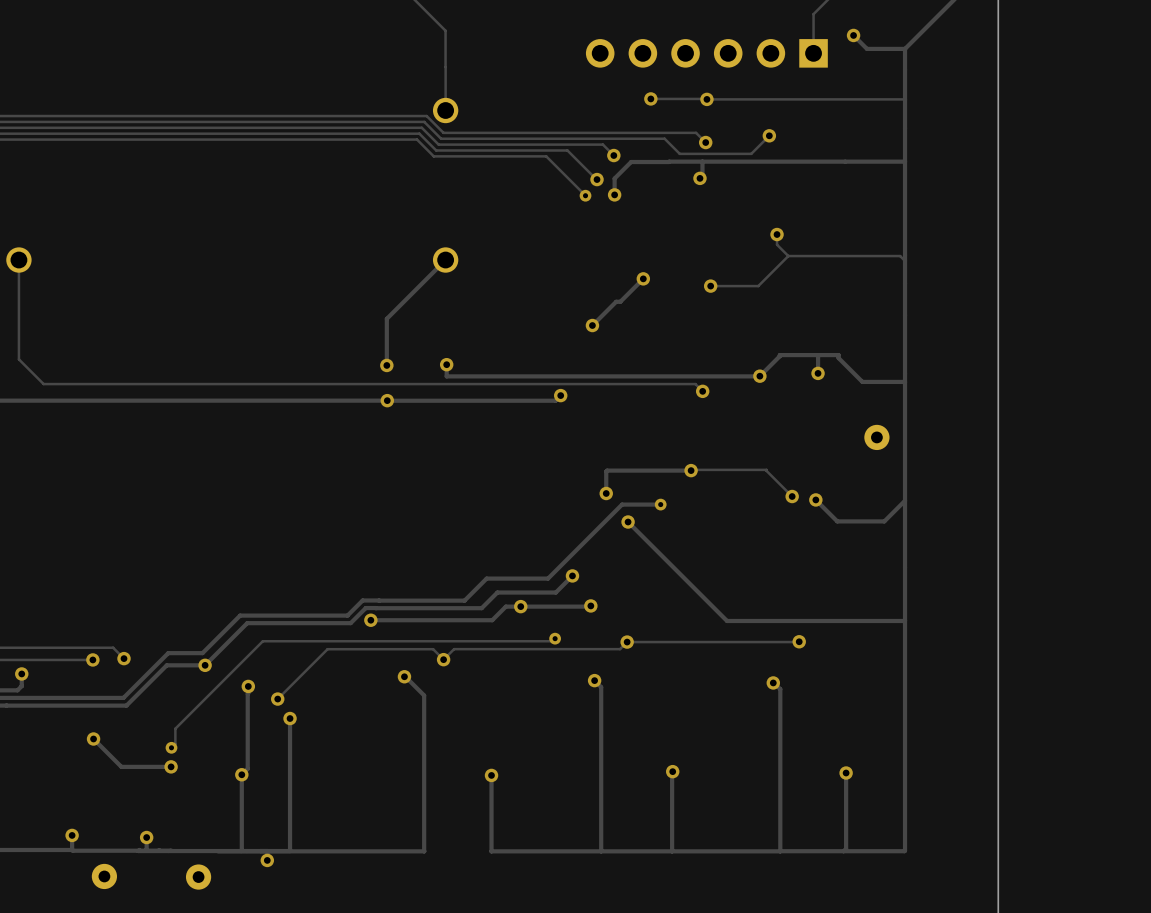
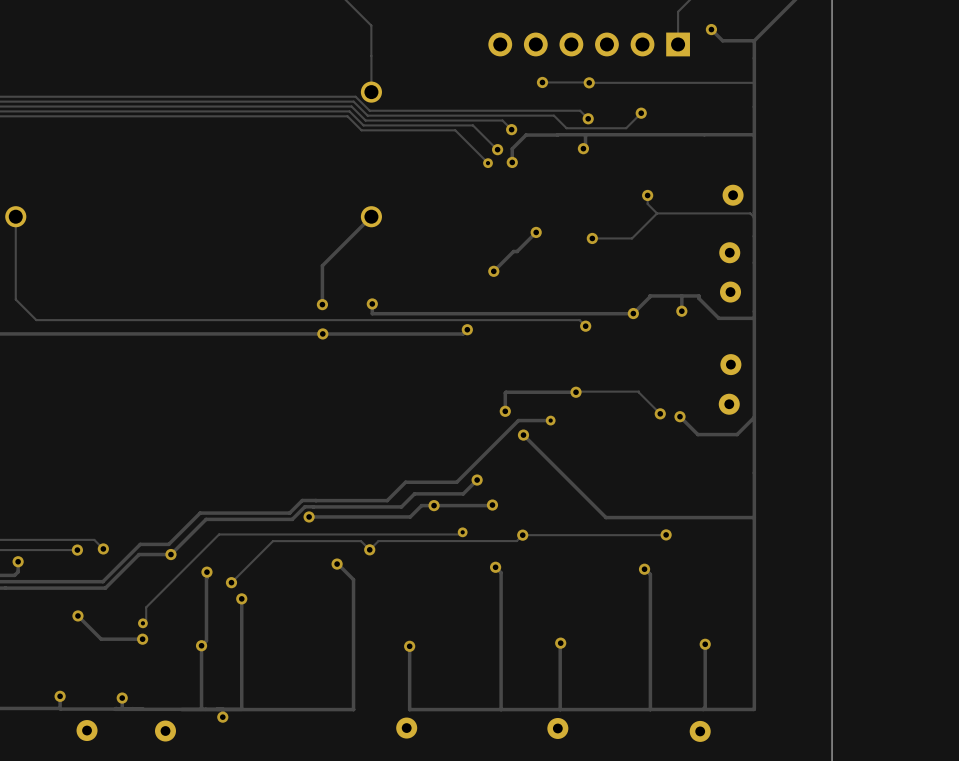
part: none -> (733, 195)
part: none -> (729, 252)
part: none -> (730, 292)
part: none -> (729, 404)
part: none -> (406, 728)
part: none -> (557, 728)
part: none -> (700, 731)

